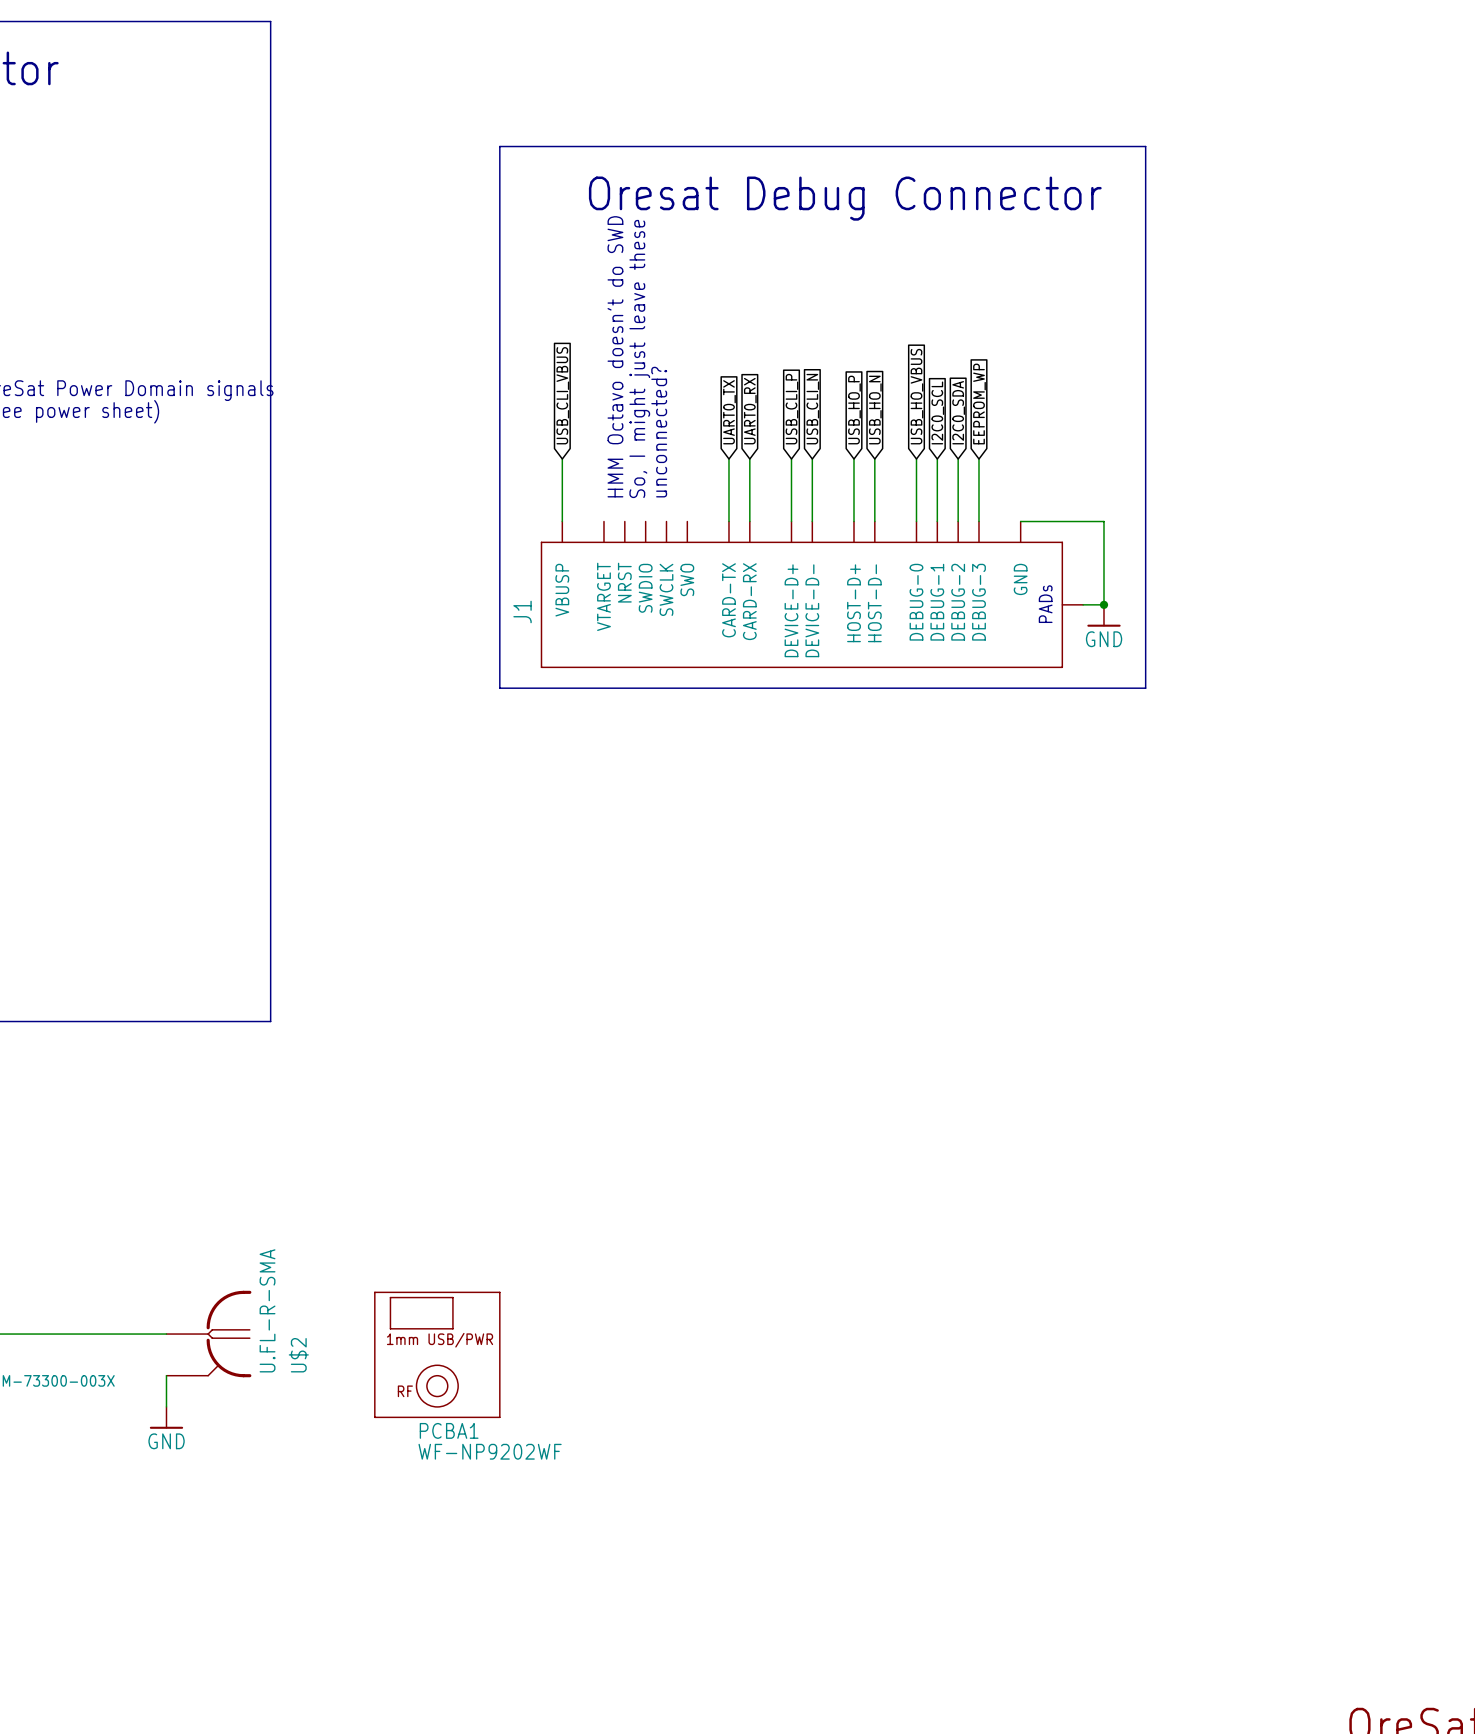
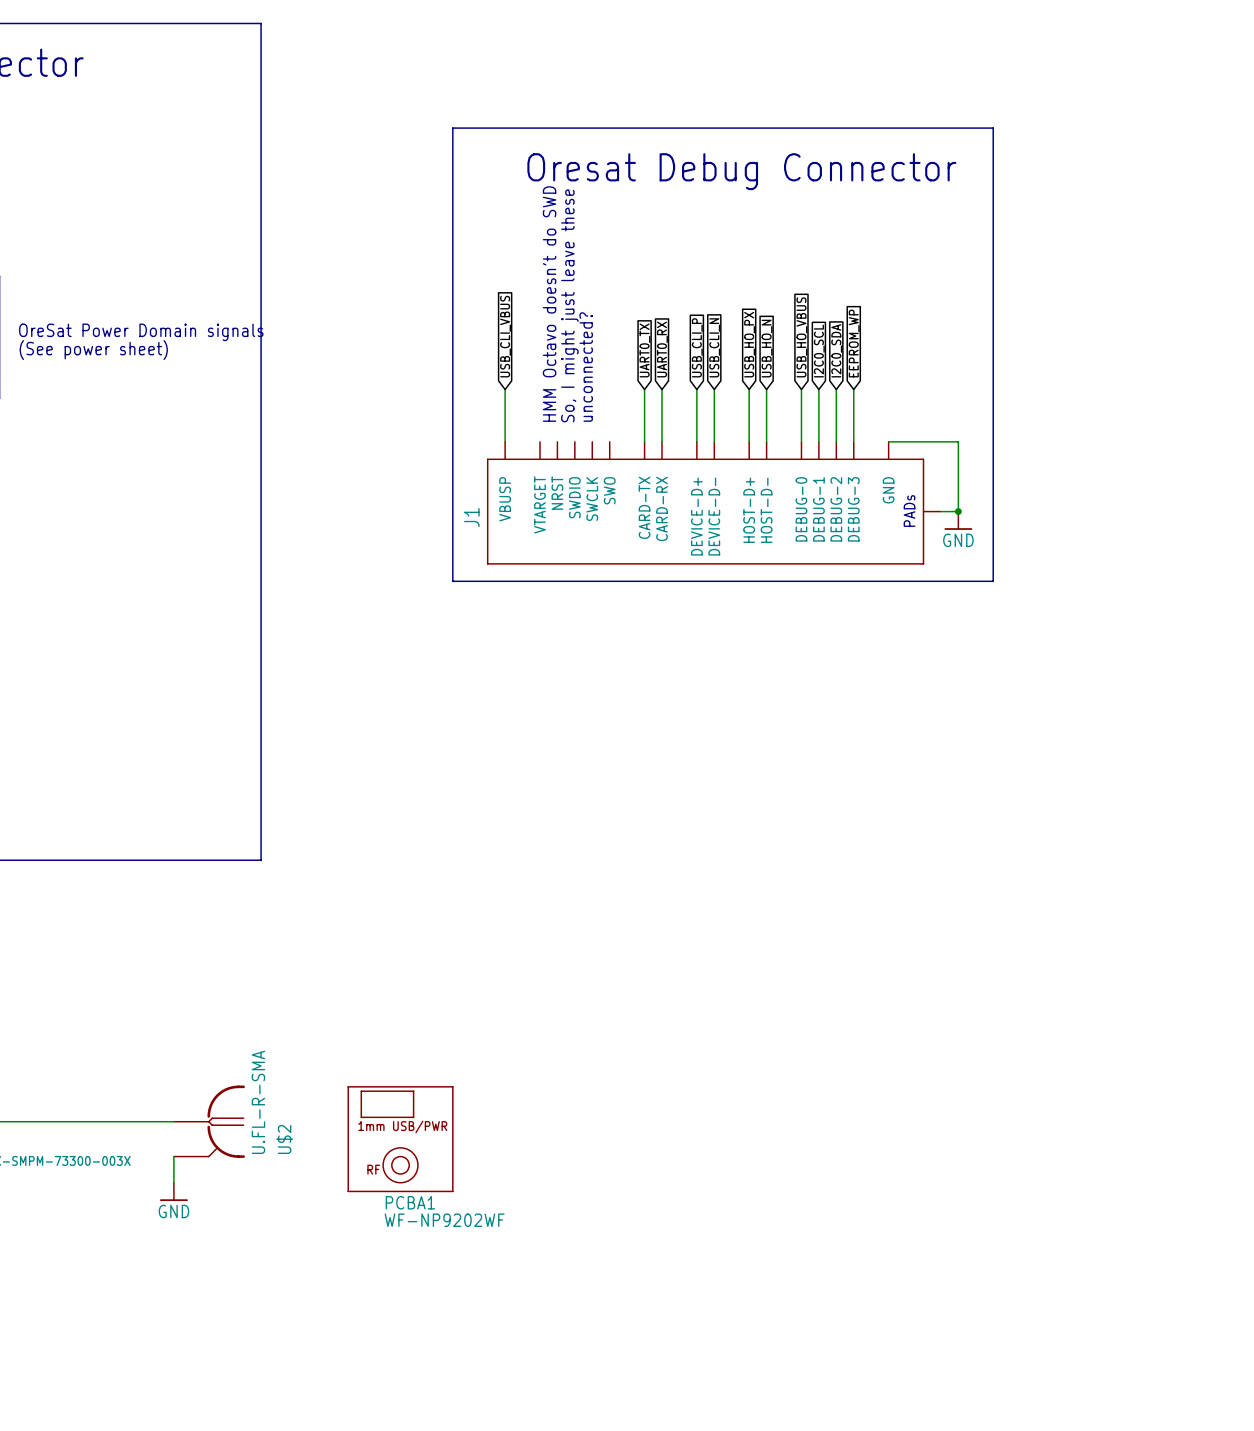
global label: USB_HO_P (854, 410) -> USB_HO_PX (749, 344)

